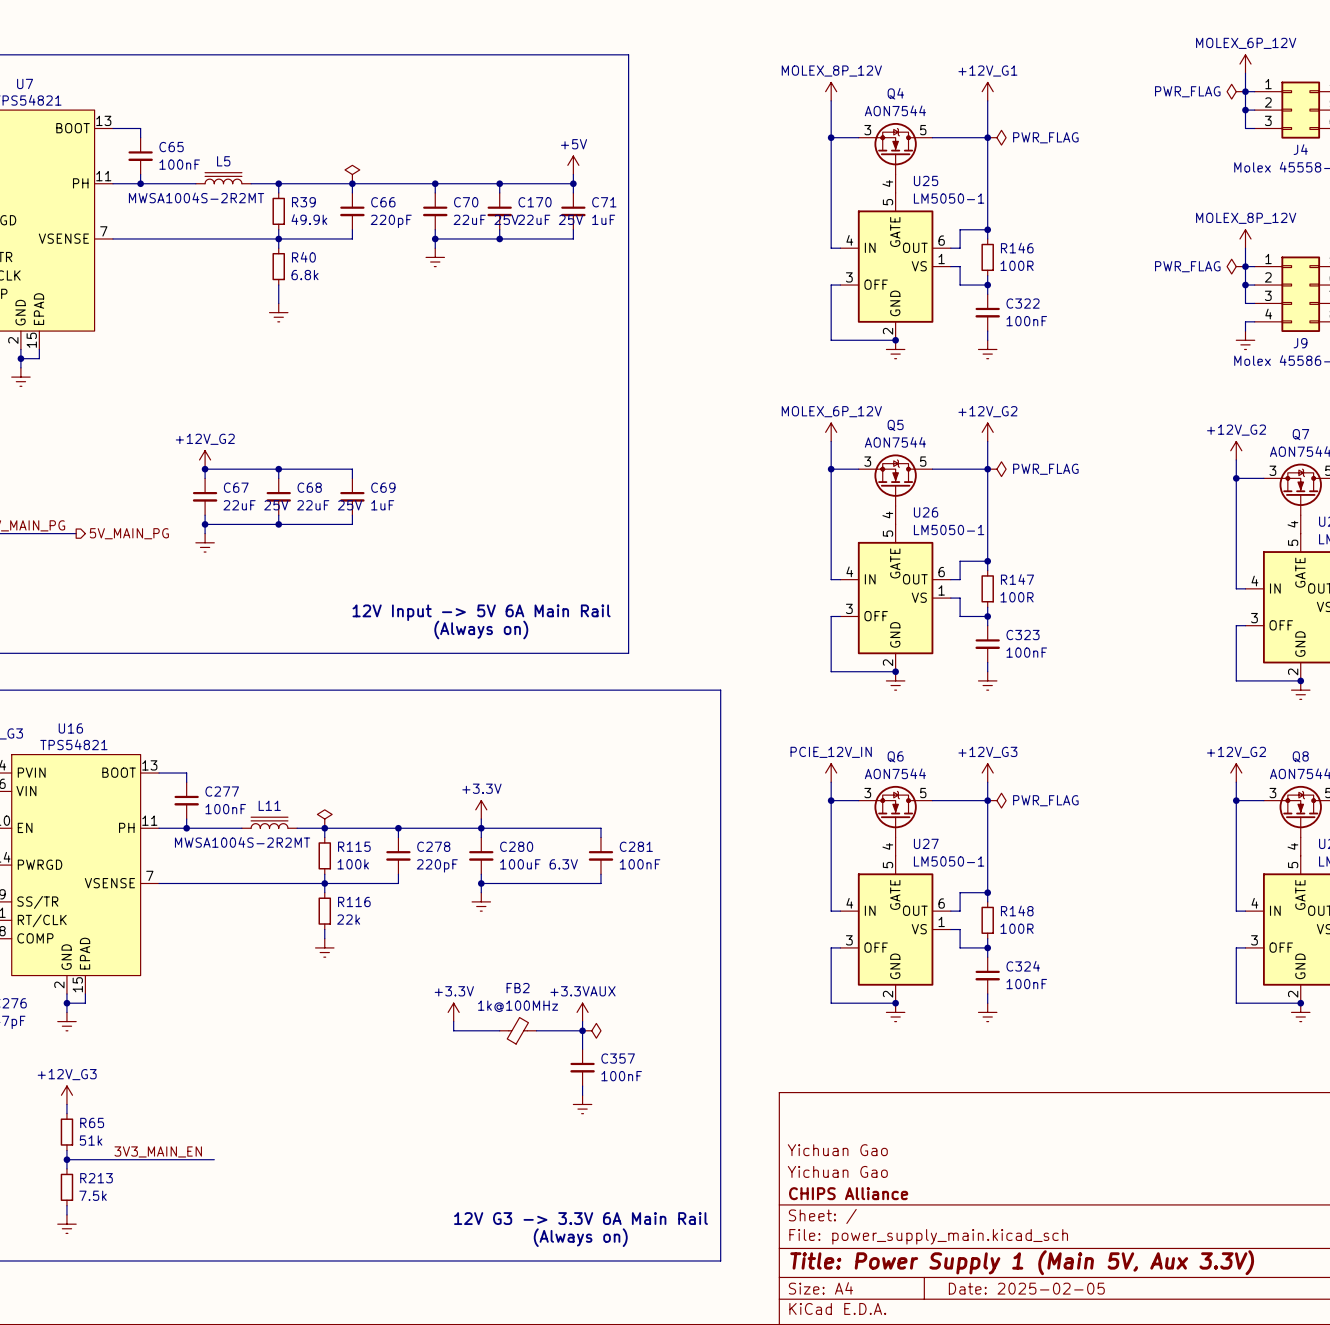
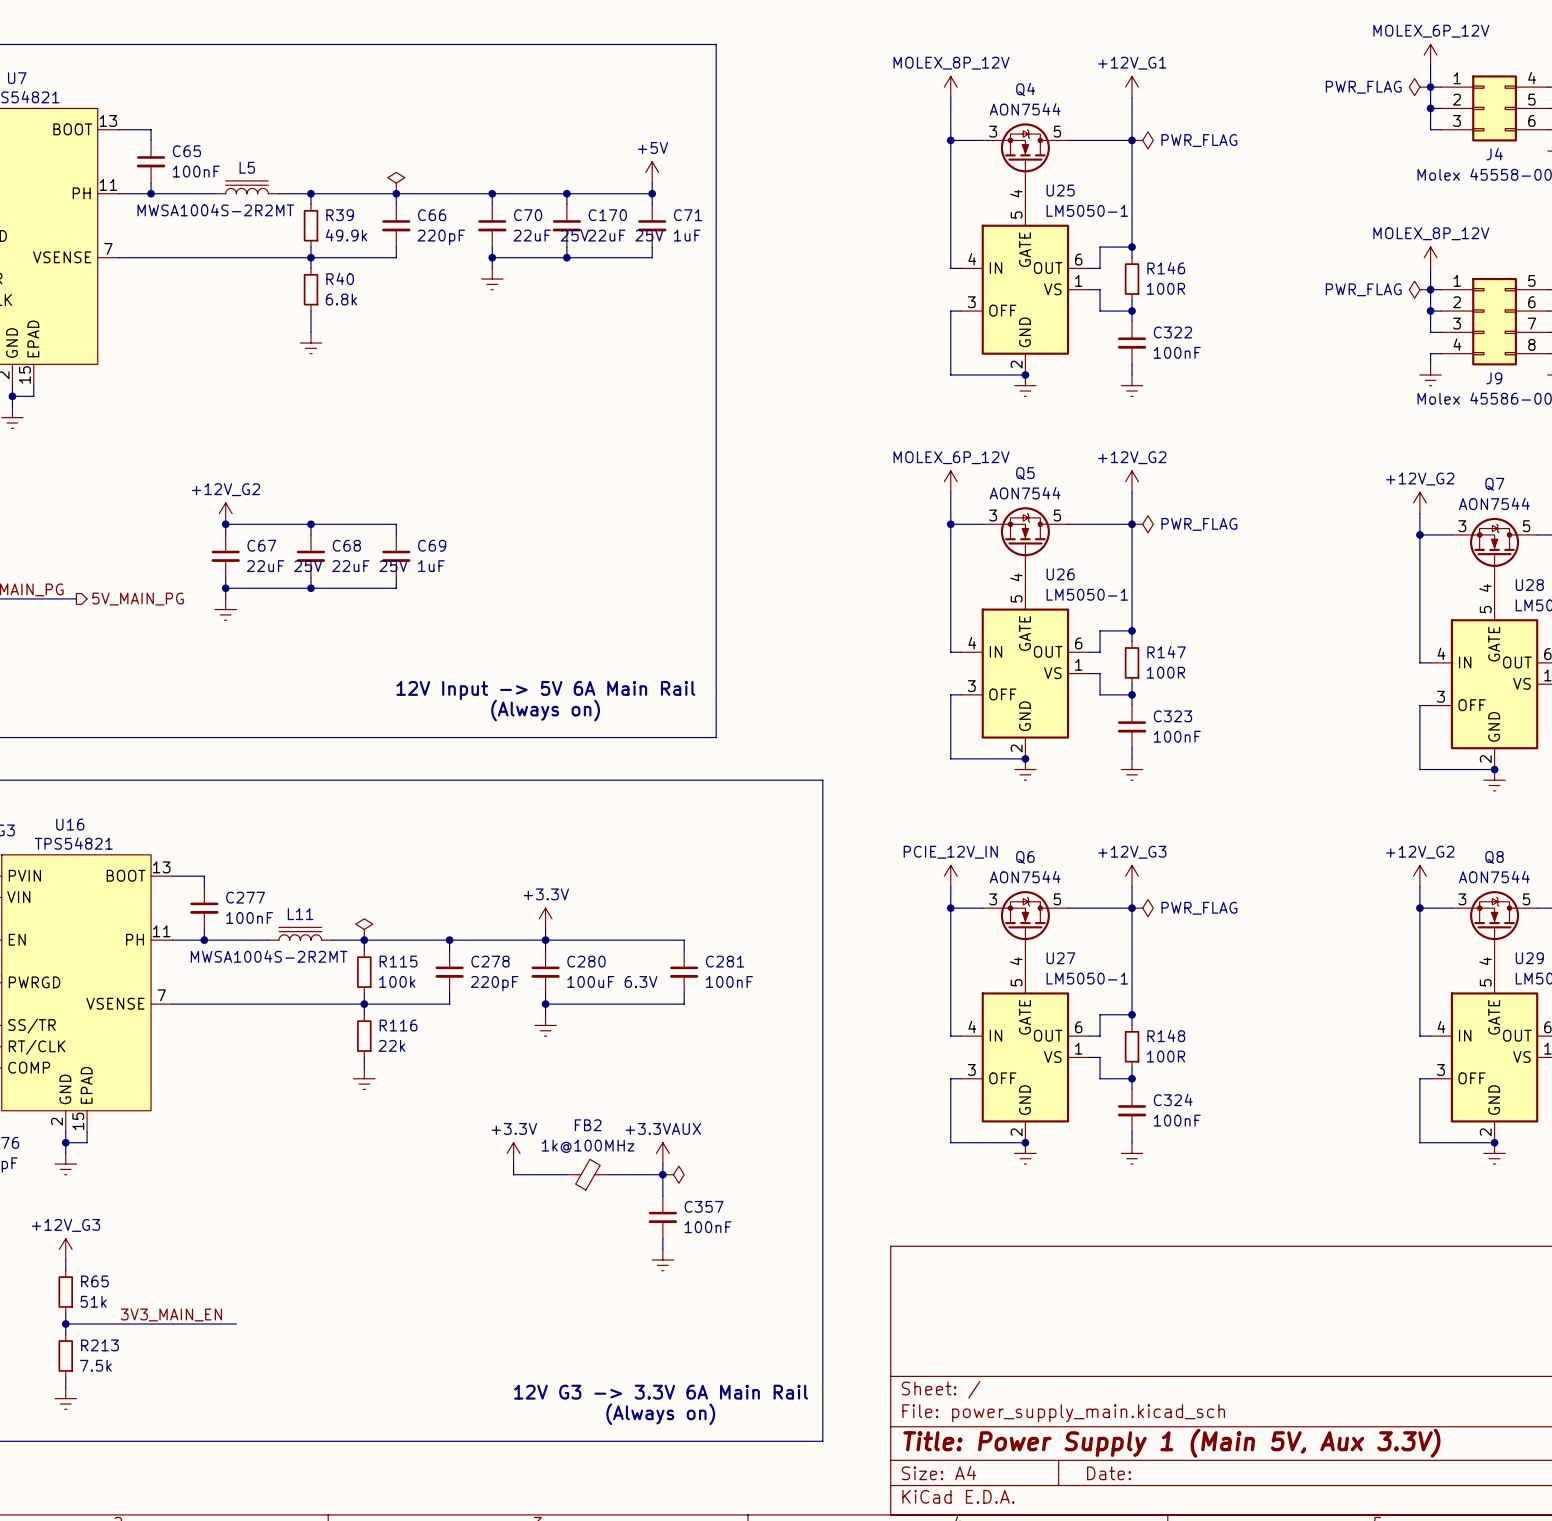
title block: Yichuan Gao (837, 1150) -> none
title block: Yichuan Gao (837, 1171) -> none
title block: CHIPS Alliance (848, 1193) -> none
title block: Date: 2025-02-05 (1026, 1288) -> Date: (1108, 1473)

